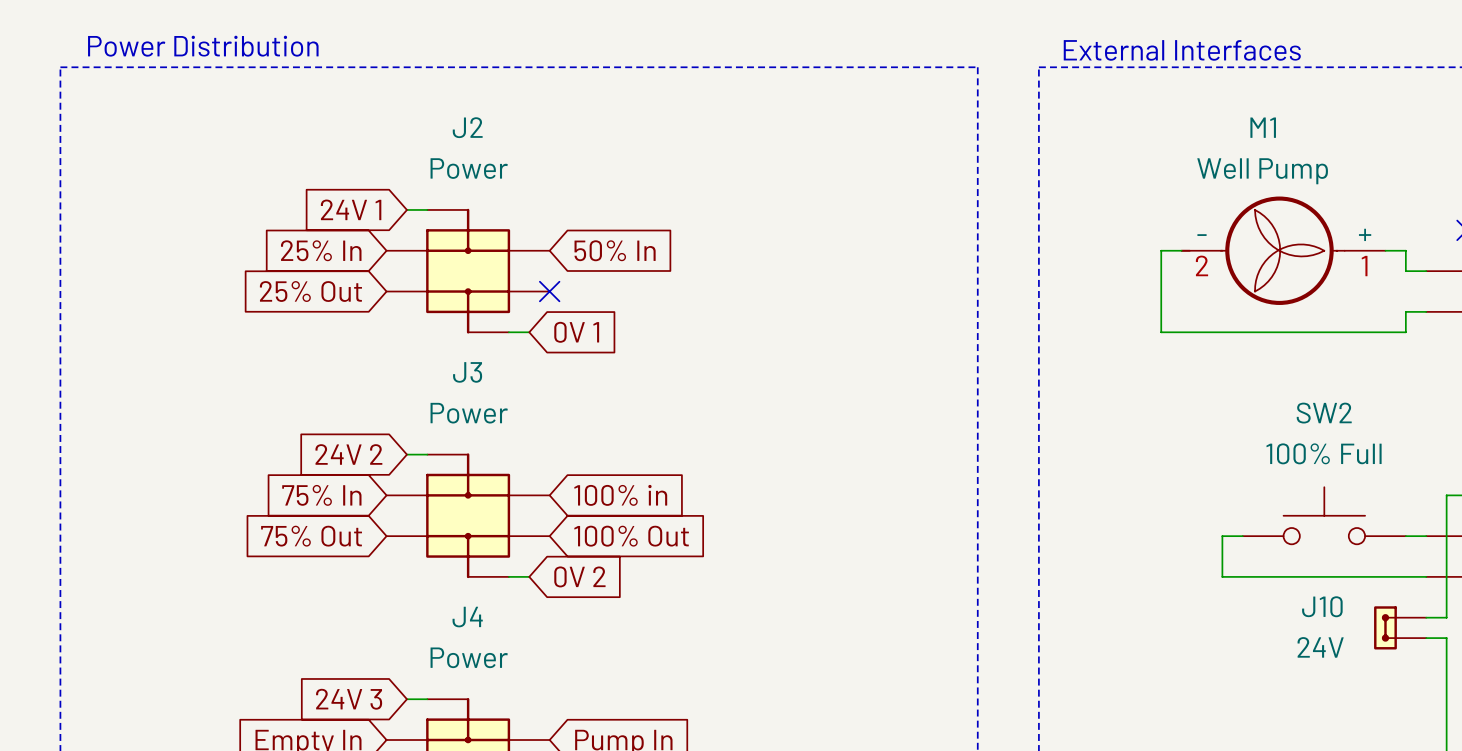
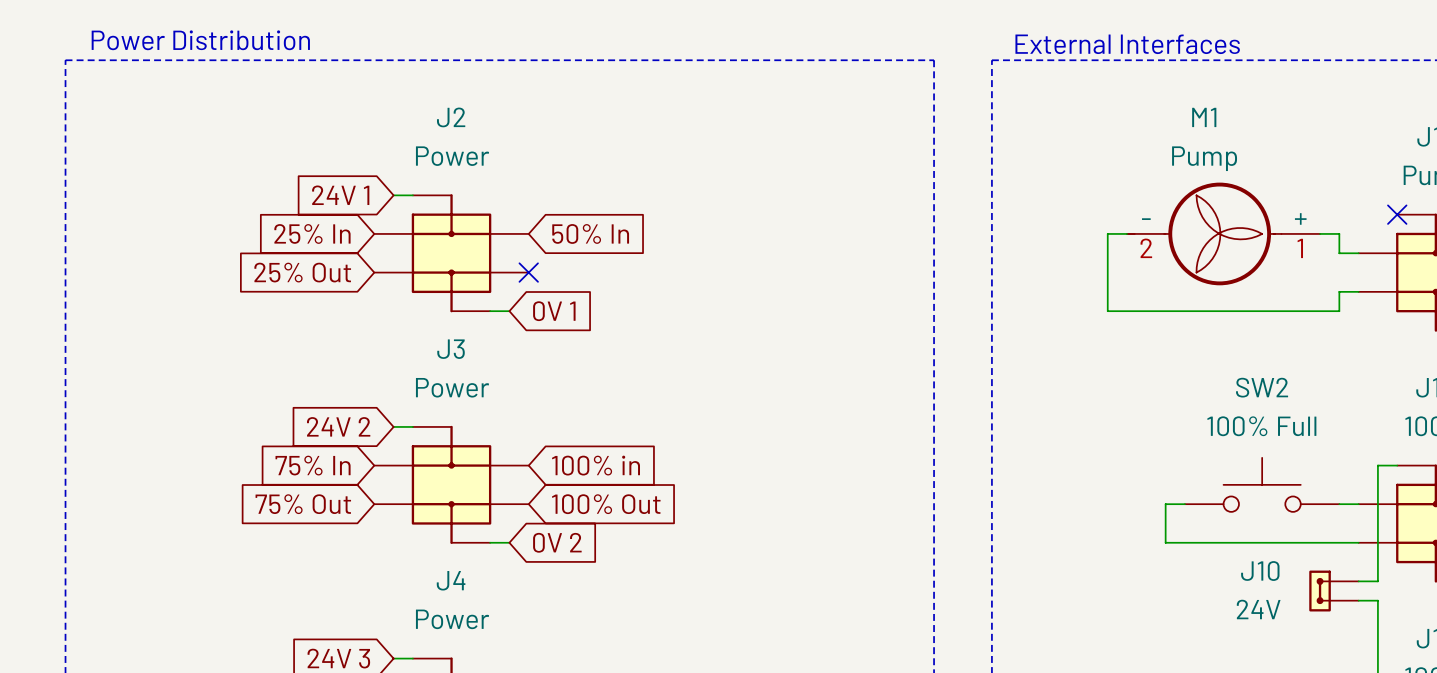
M1 value: Well Pump (1262, 171) -> Pump (1204, 158)

